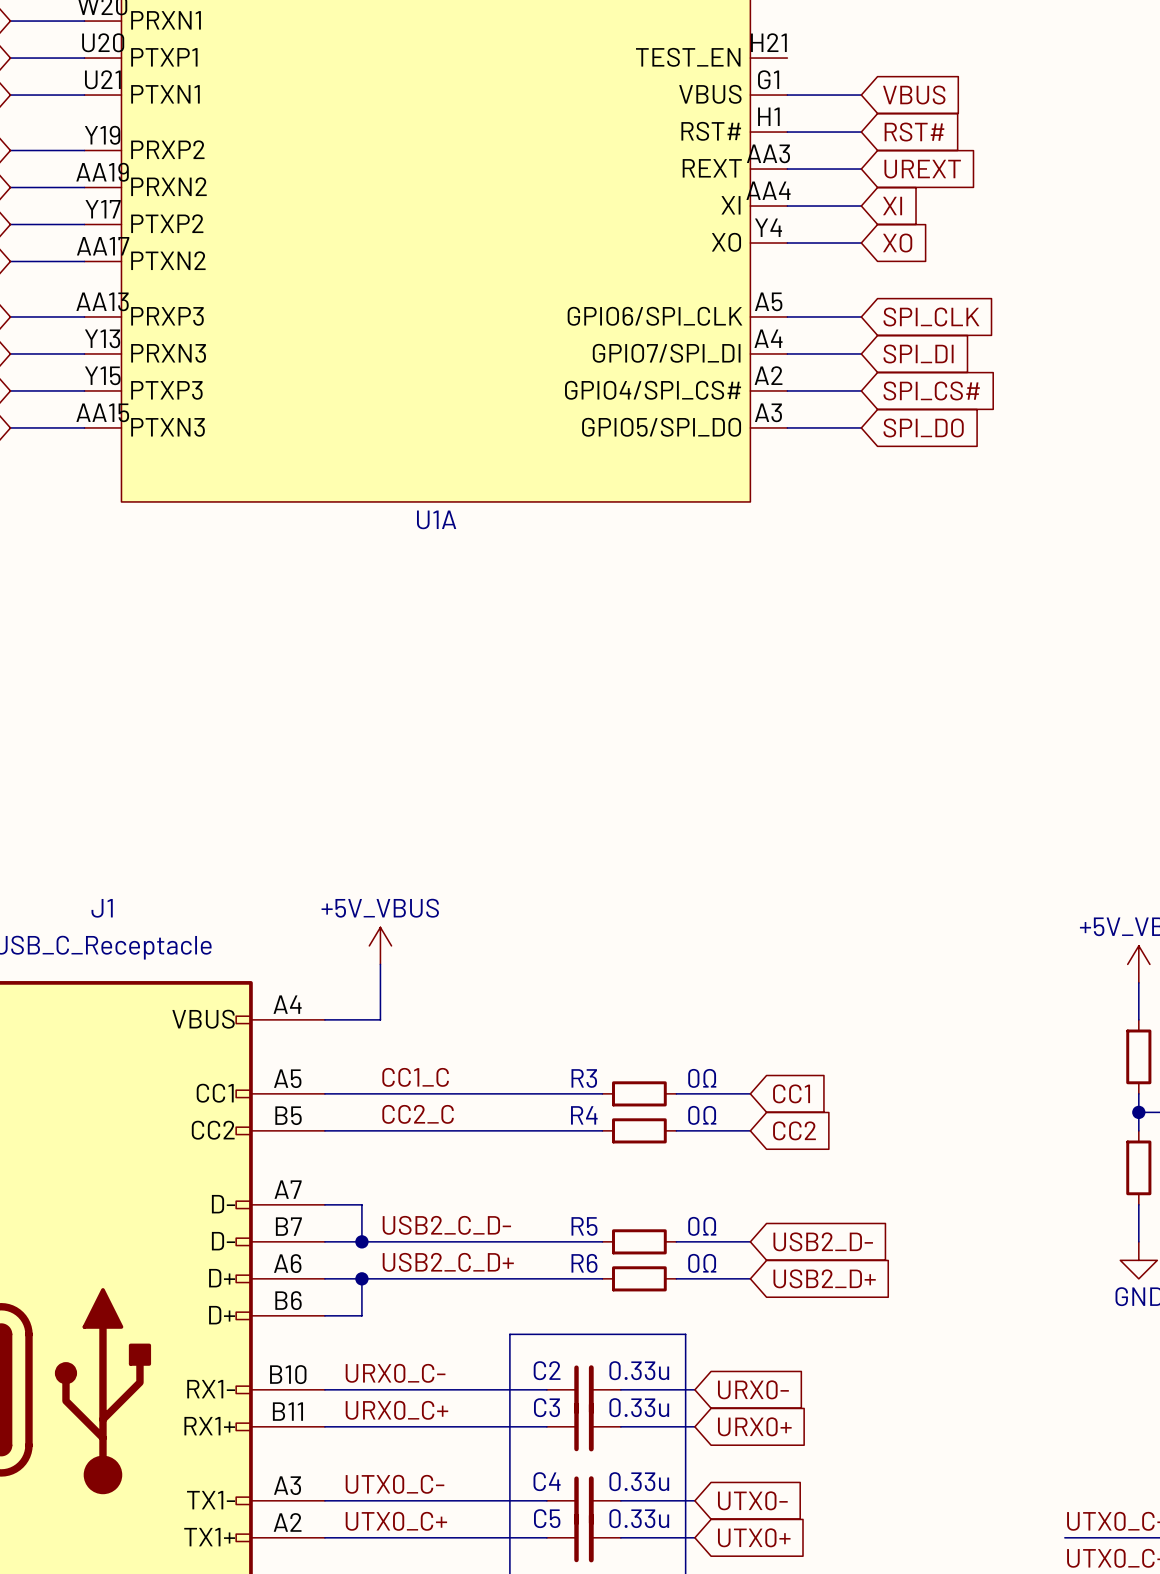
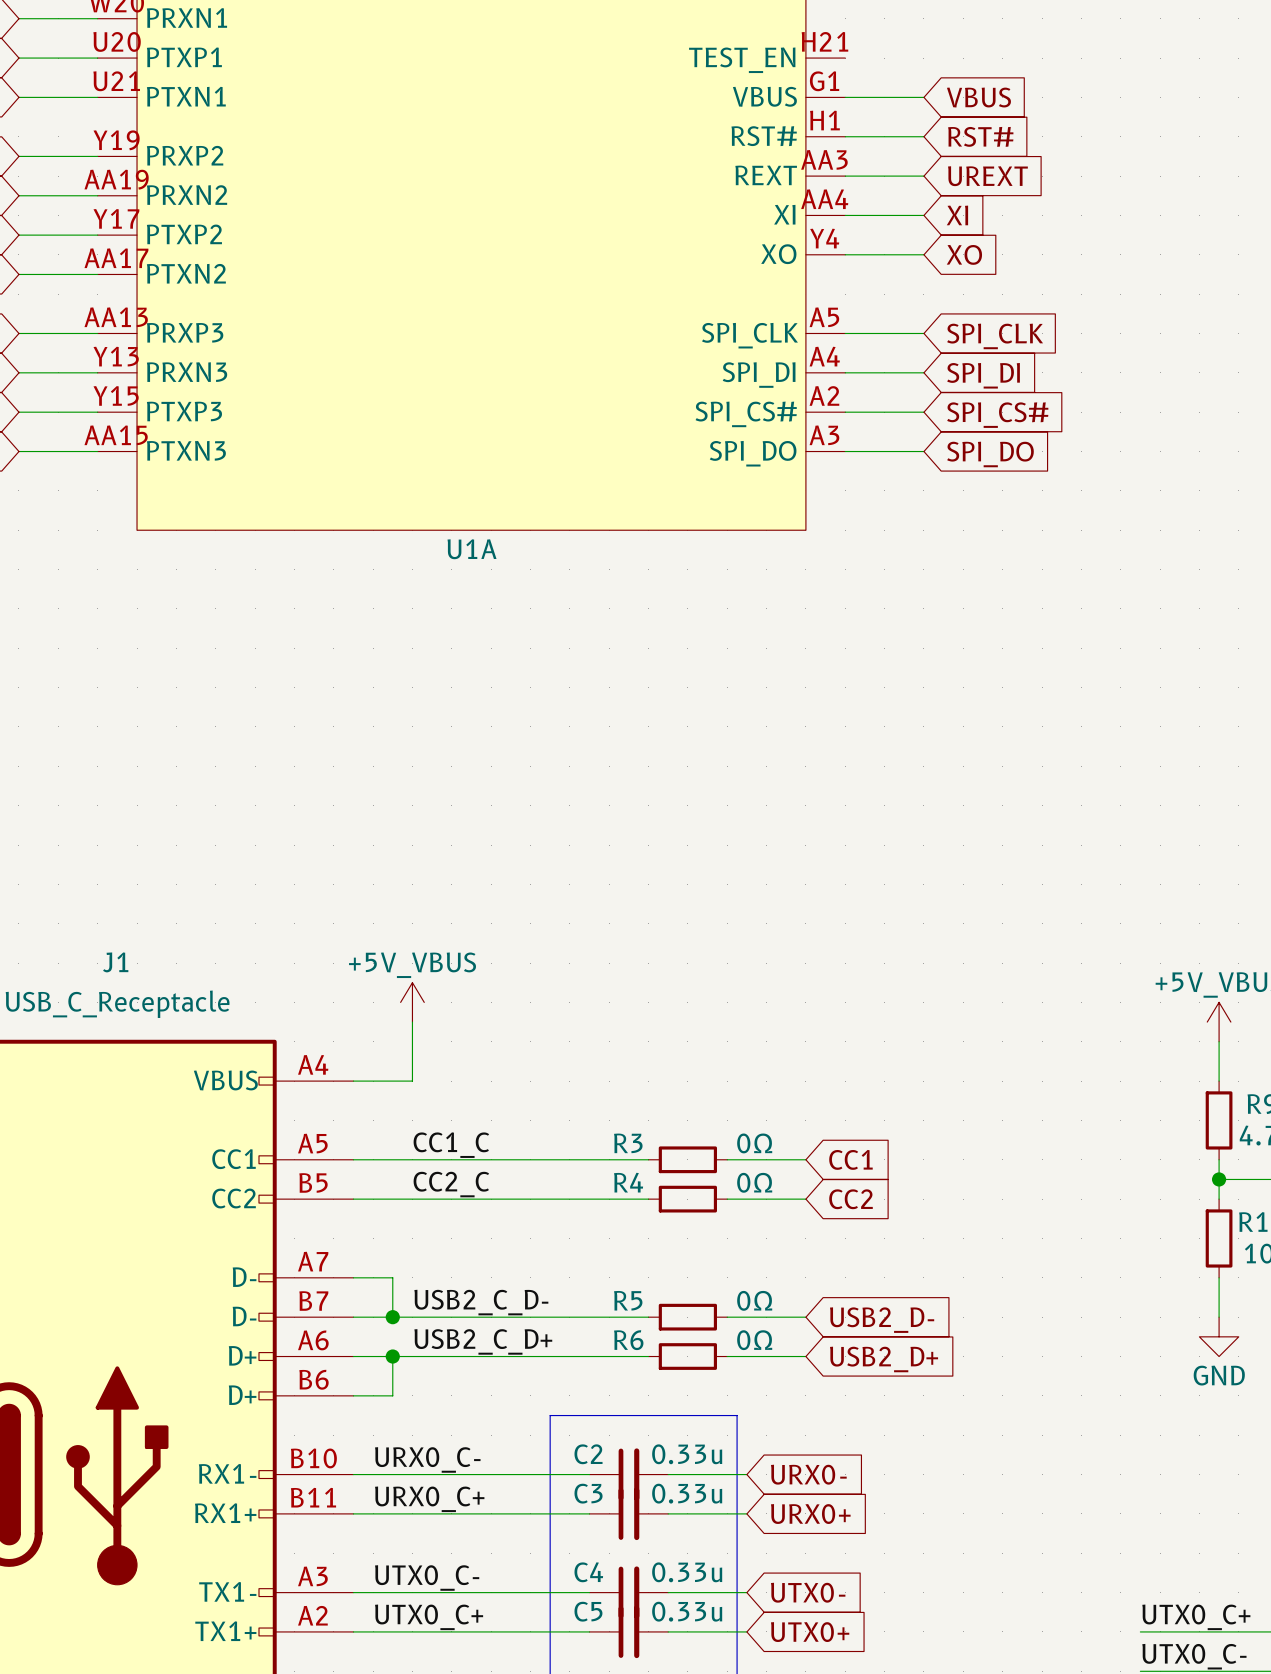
U1A pin name: GPIO6/SPI_CLK (654, 316) -> SPI_CLK (749, 335)
U1A pin name: GPIO7/SPI_DI (666, 353) -> SPI_DI (759, 375)
U1A pin name: GPIO4/SPI_CS# (653, 390) -> SPI_CS# (746, 414)
U1A pin name: GPIO5/SPI_DO (661, 427) -> SPI_DO (753, 453)

